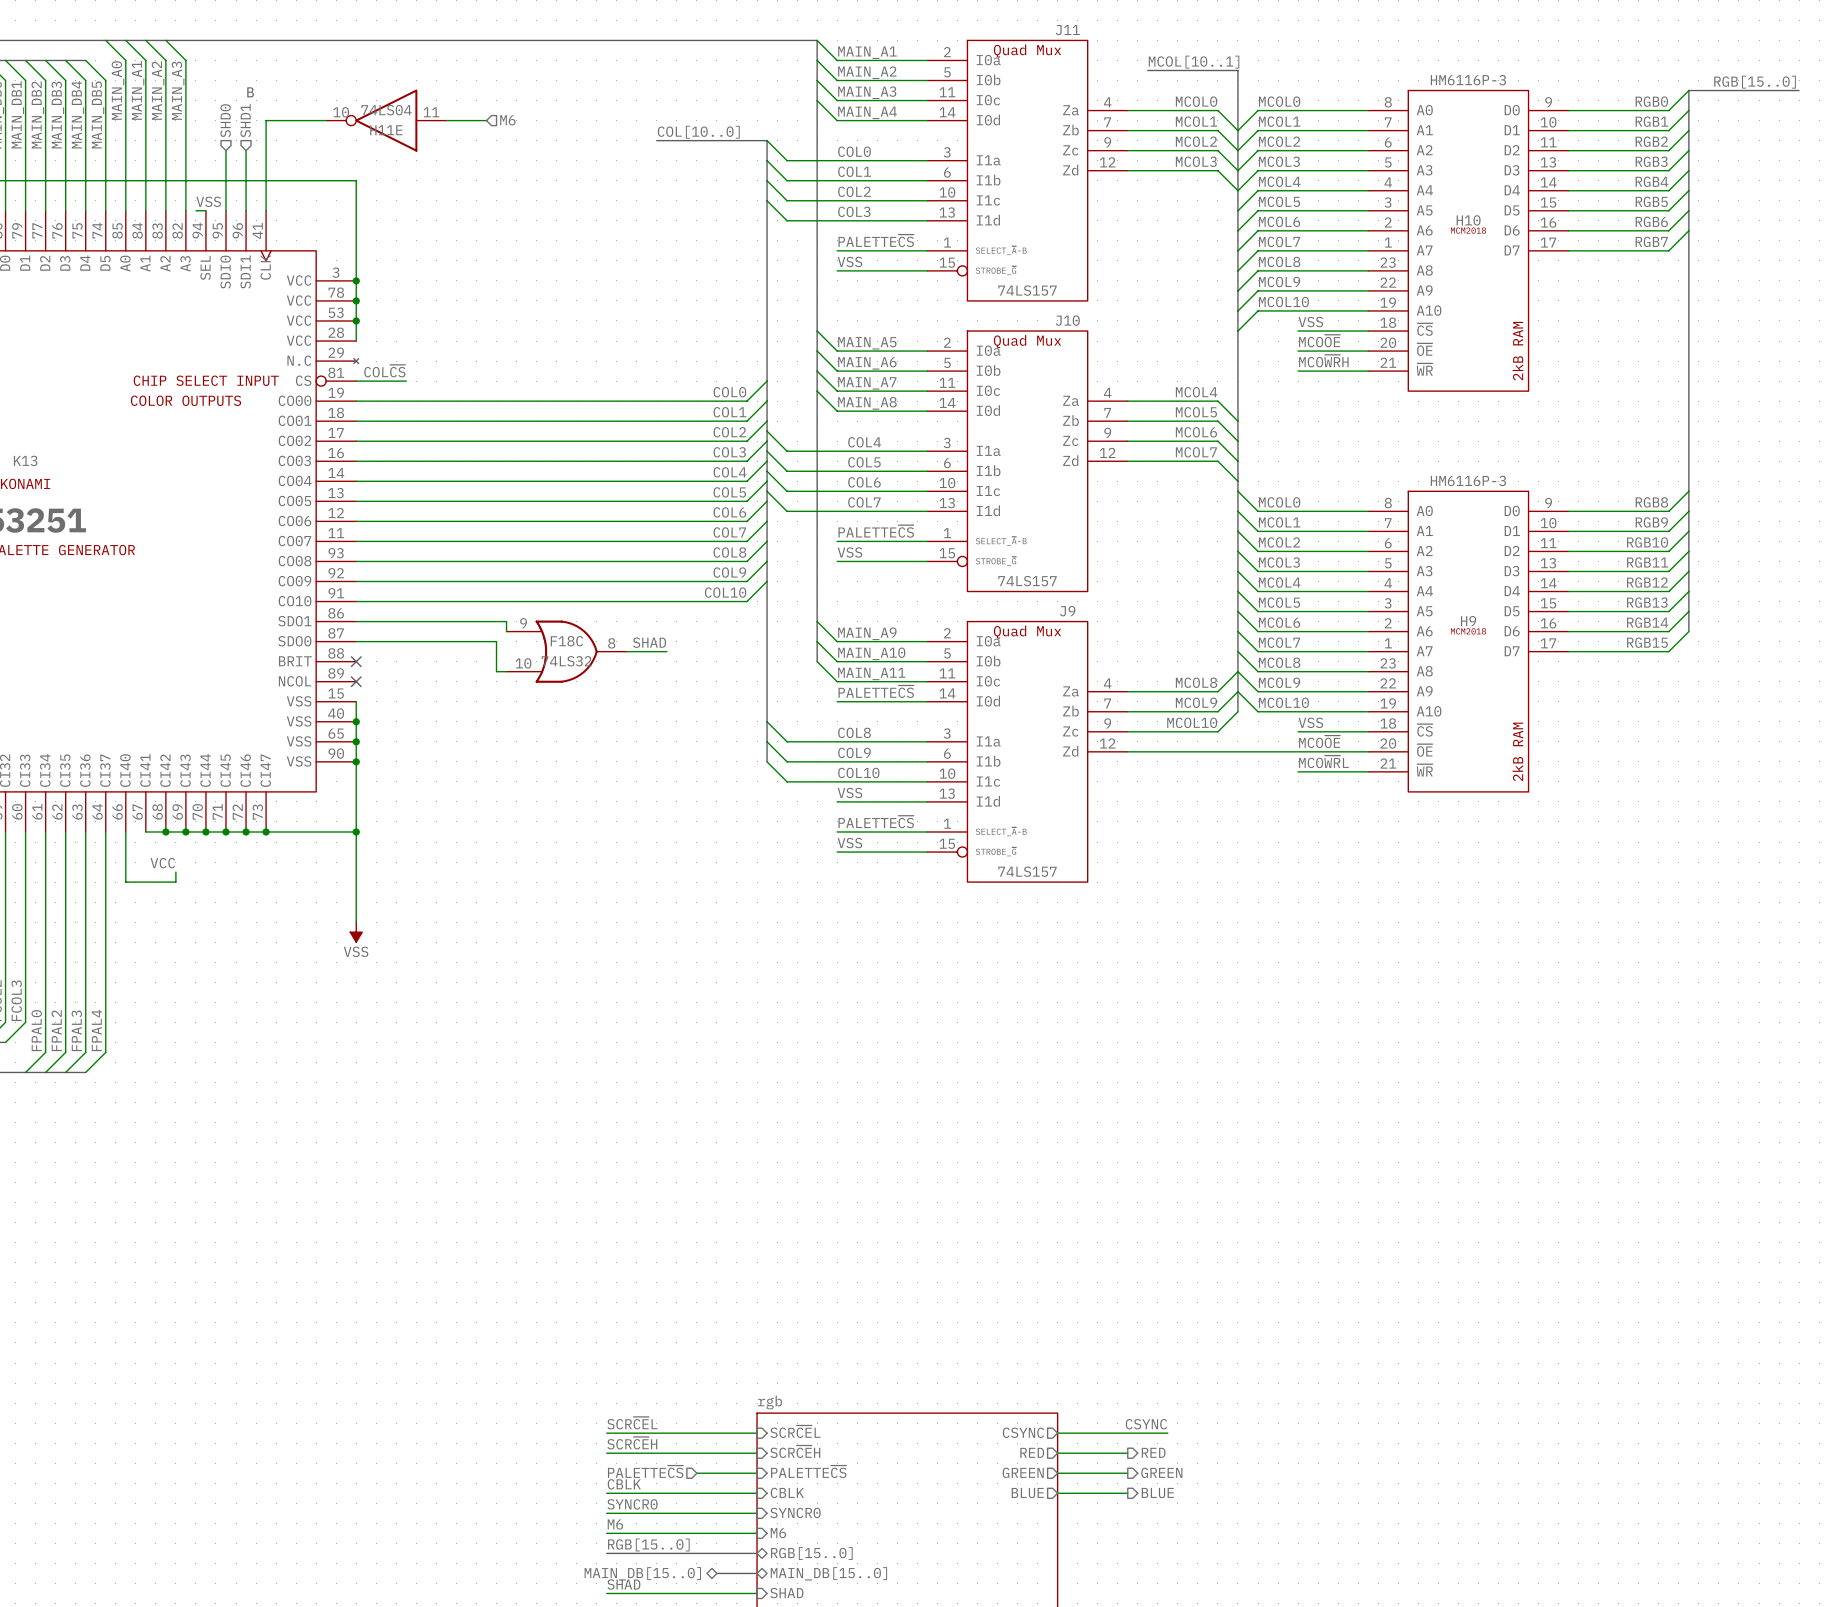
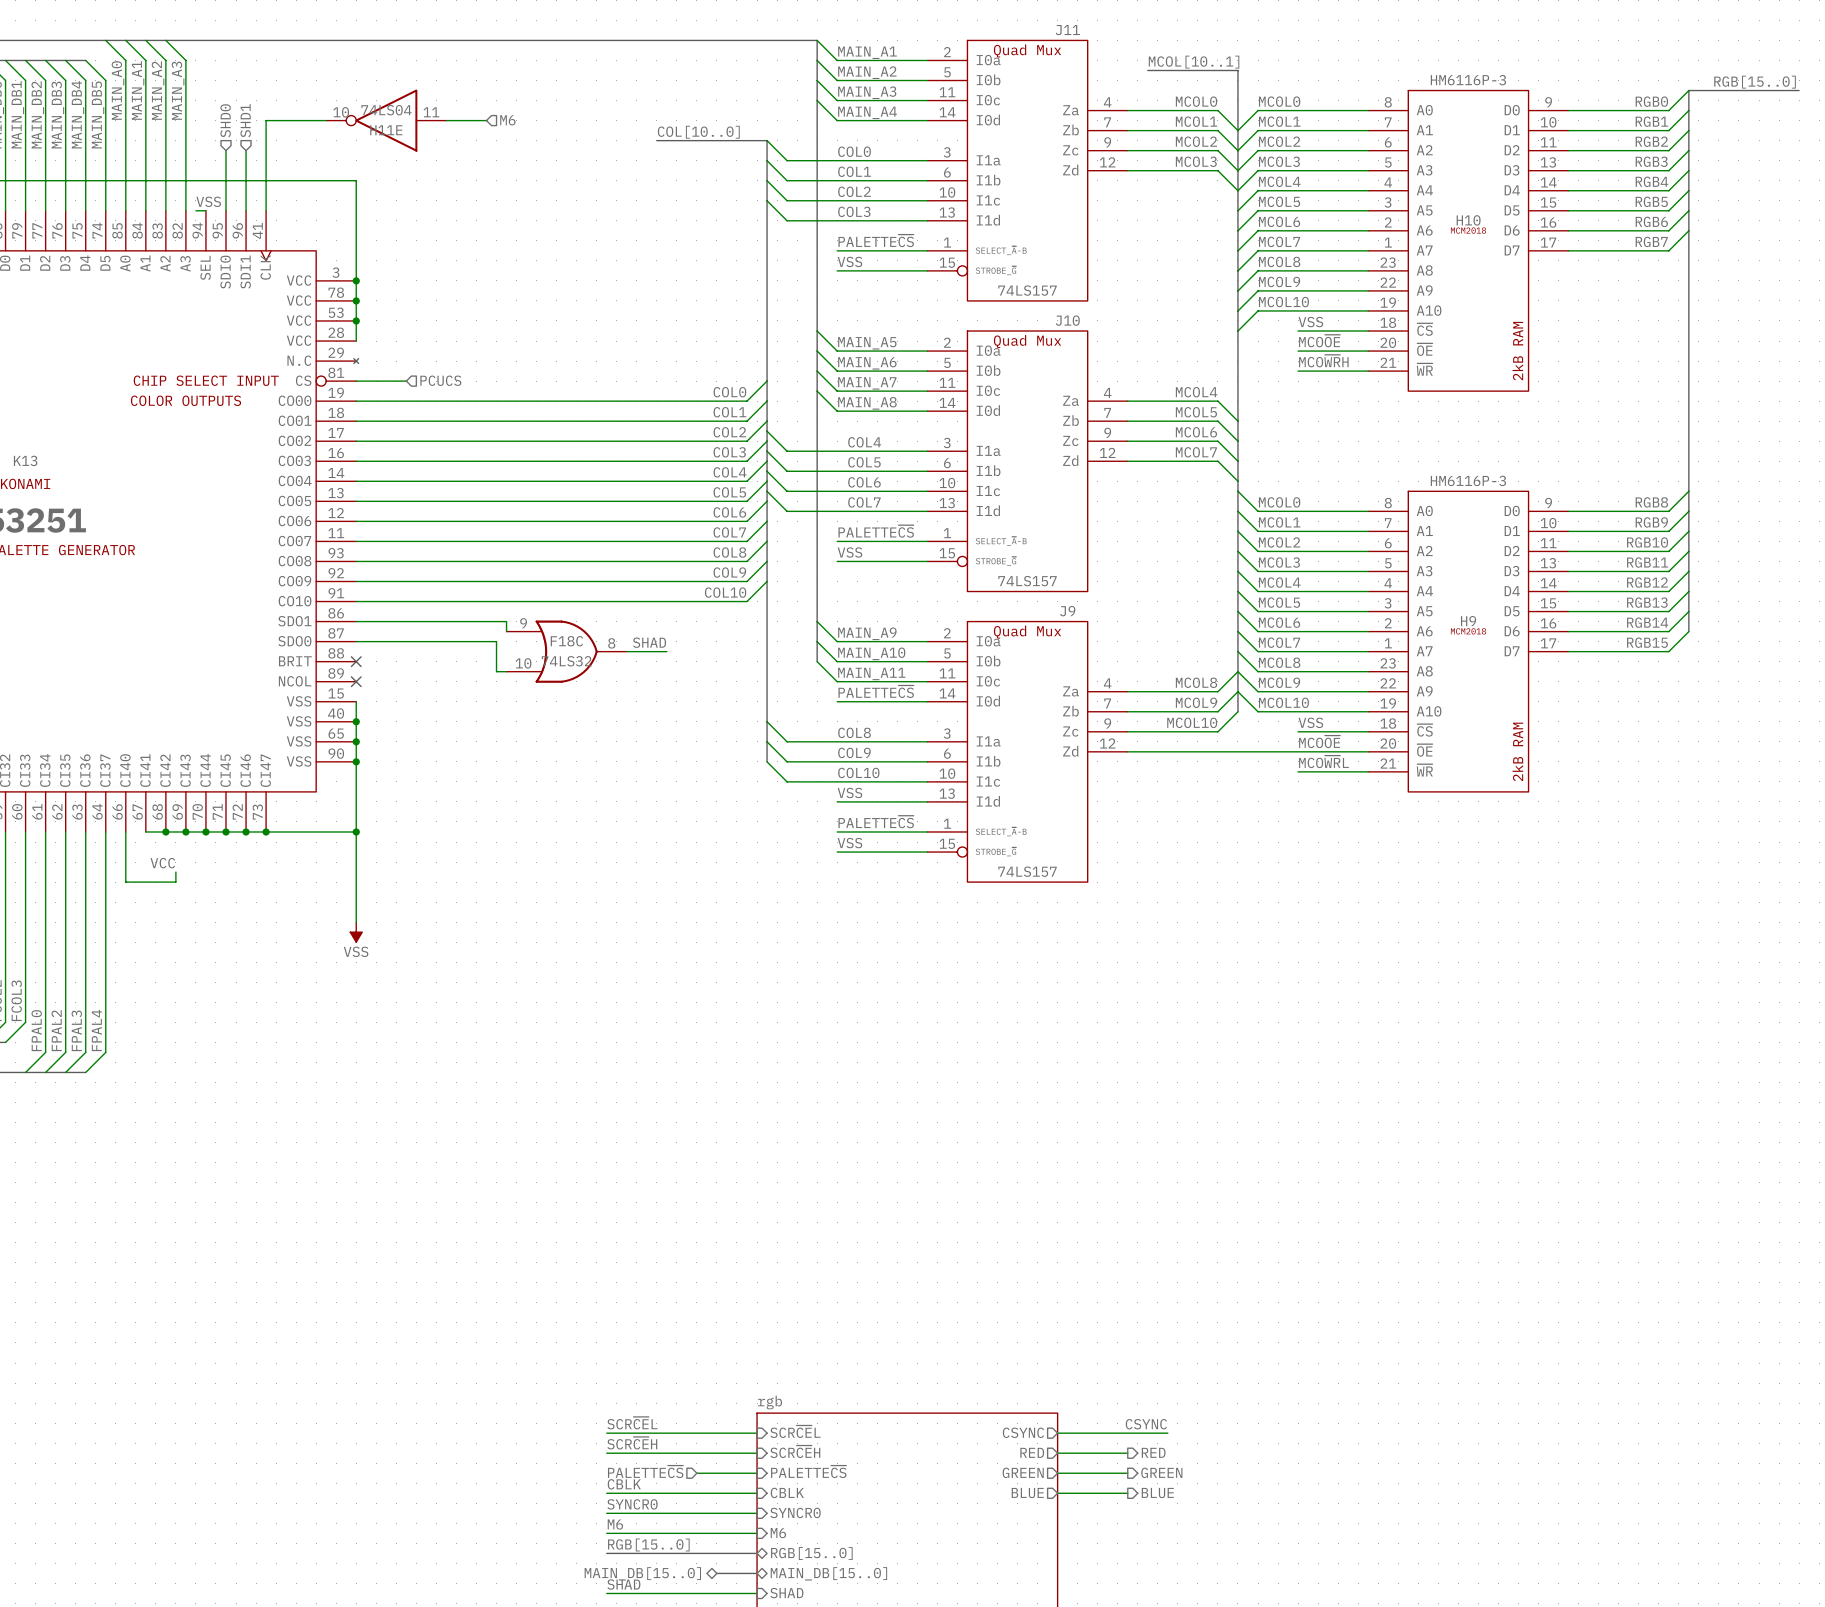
text: B (250, 92) -> none
label: COL~{CS} (384, 371) -> none
hierarchical label: none -> PCUCS (440, 380)

